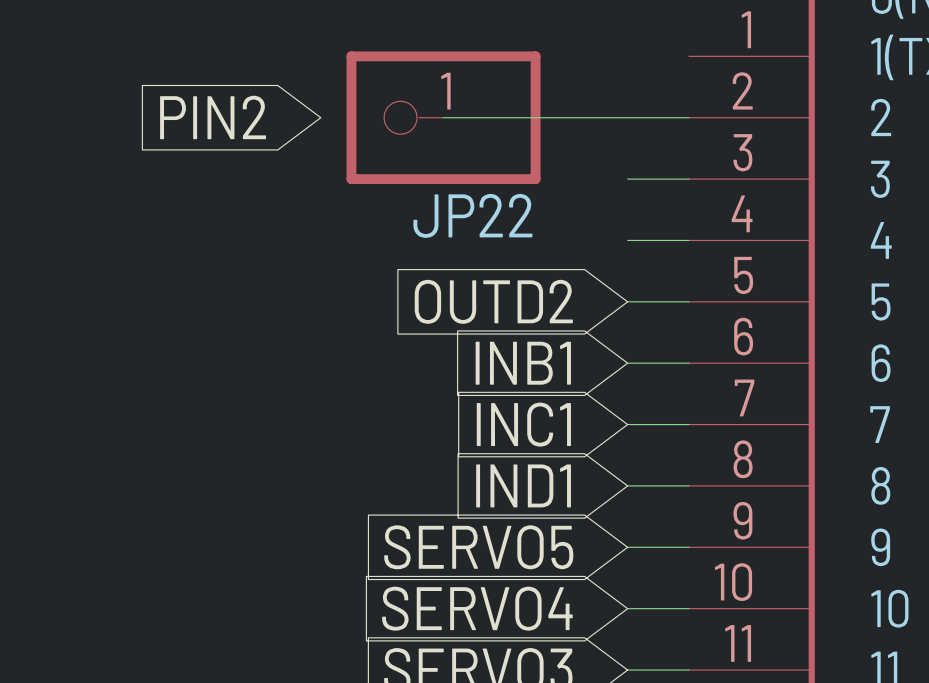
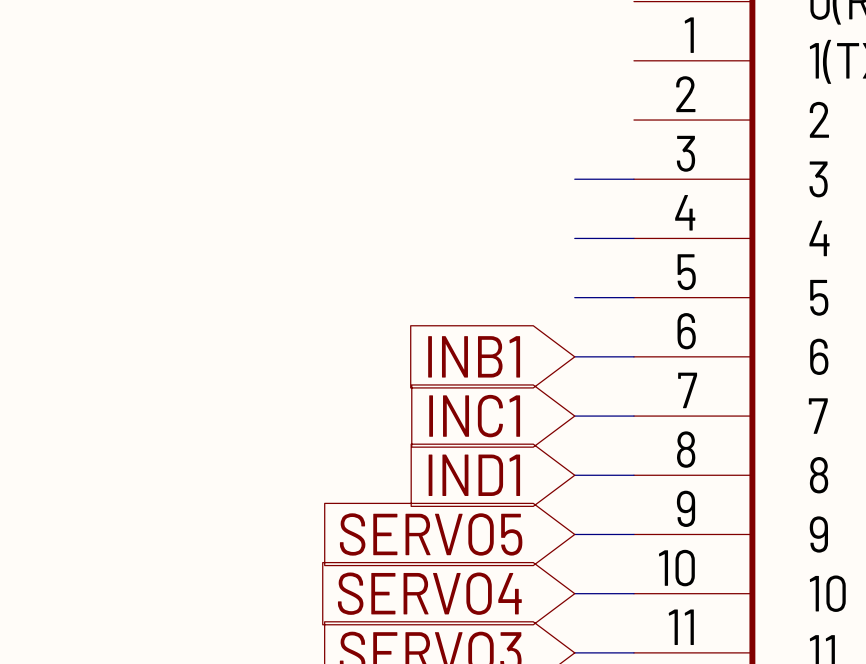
global label: PIN2 (213, 117) -> none
wire: (443, 117) (689, 117) -> none
JP22: (443, 117) -> none
global label: OUTD2 (493, 301) -> none

